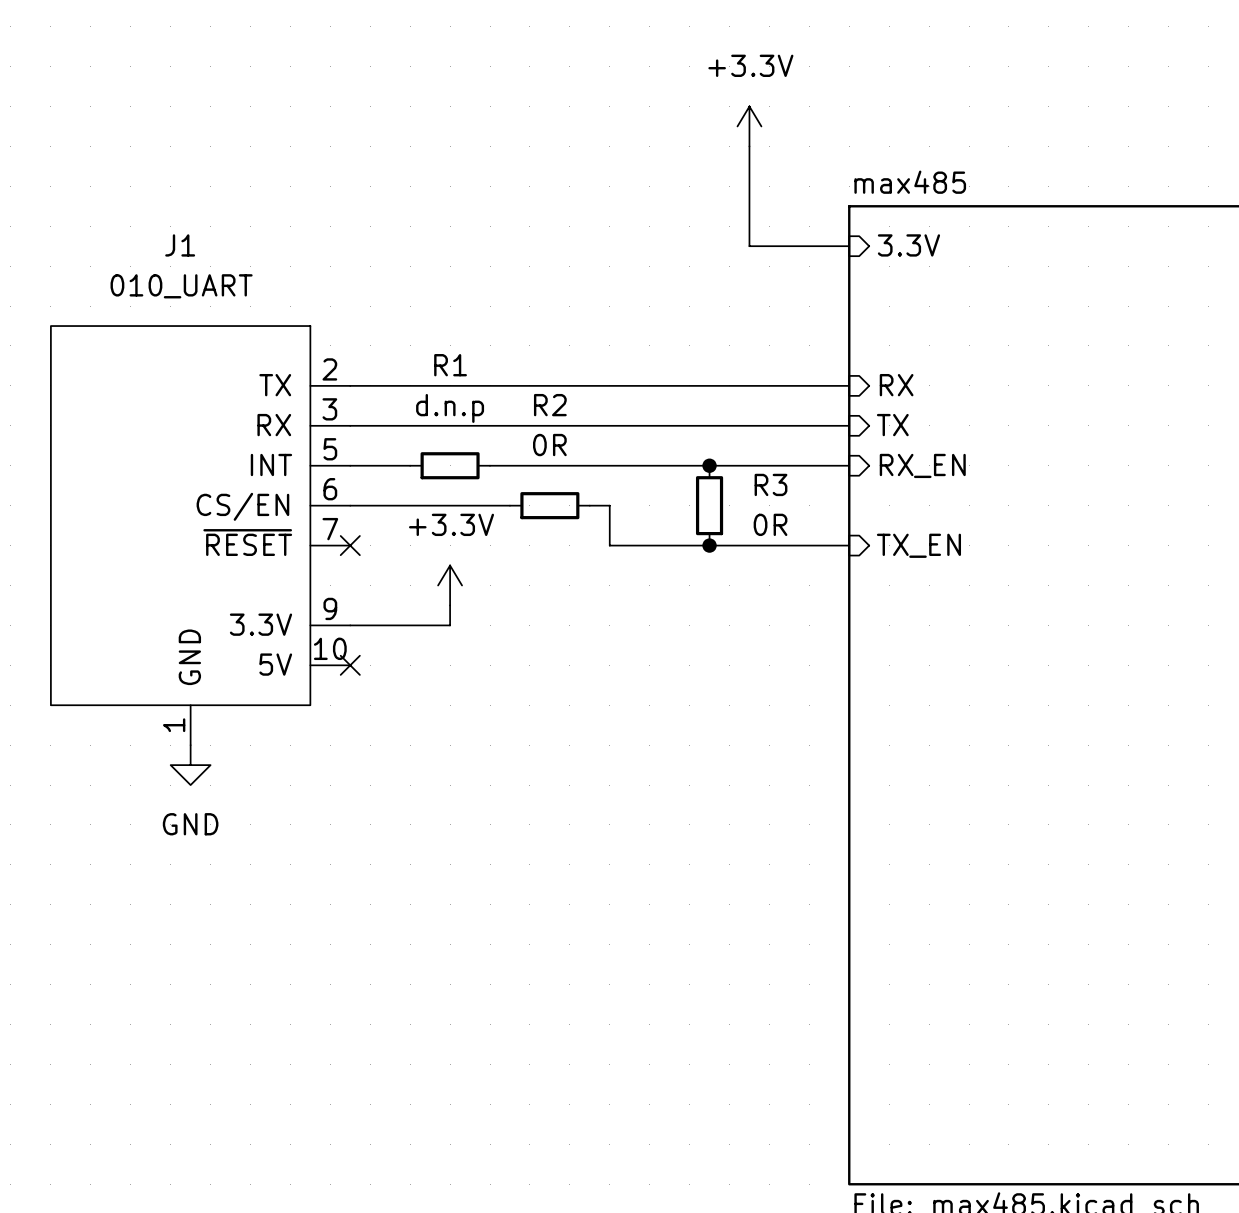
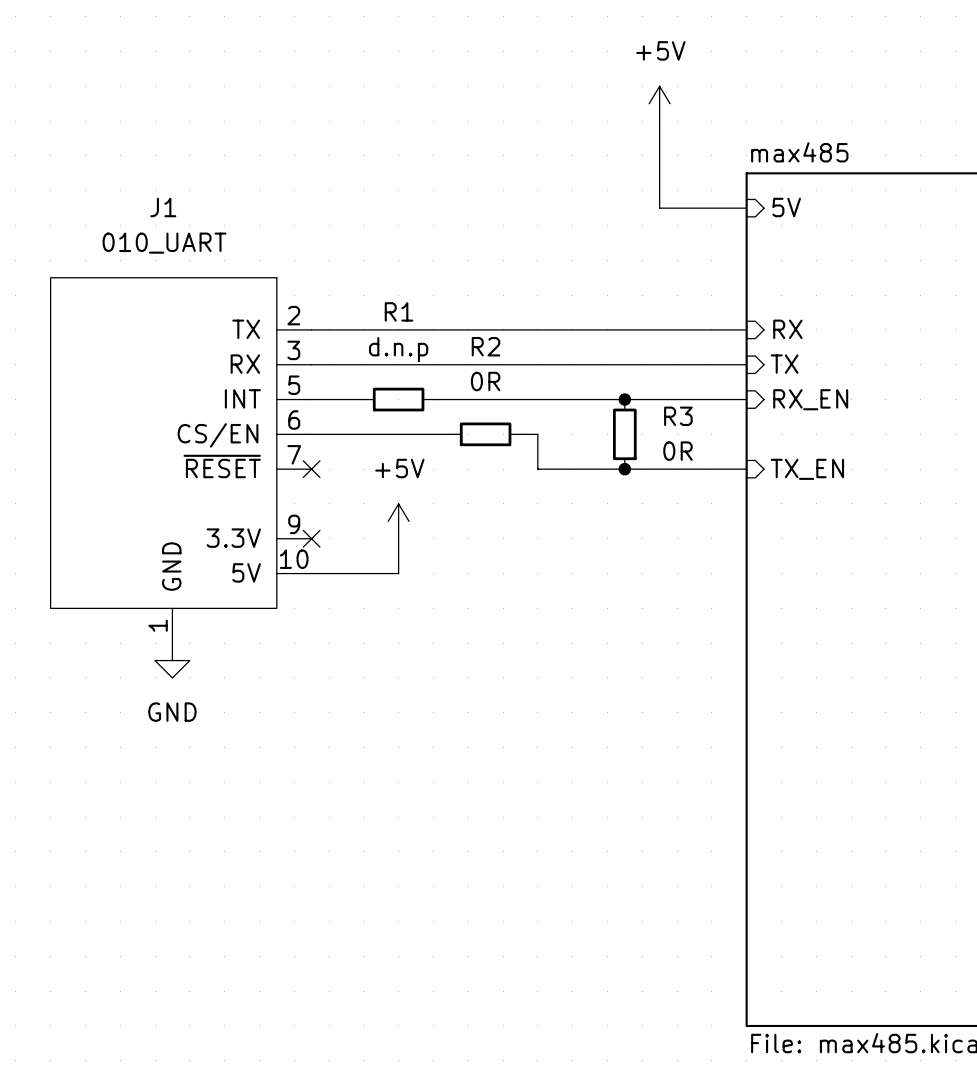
power symbol: +3.3V (749, 126) -> +5V (659, 103)
sheet pin: 3.3V (908, 245) -> 5V (786, 207)
power symbol: +3.3V (450, 585) -> none
wire: (450, 605) (450, 625) (350, 625) -> none
power symbol: none -> +5V (398, 521)
wire: none -> (398, 538) (398, 573) (311, 573)
no-connect mark position: (350, 665) -> (311, 538)

